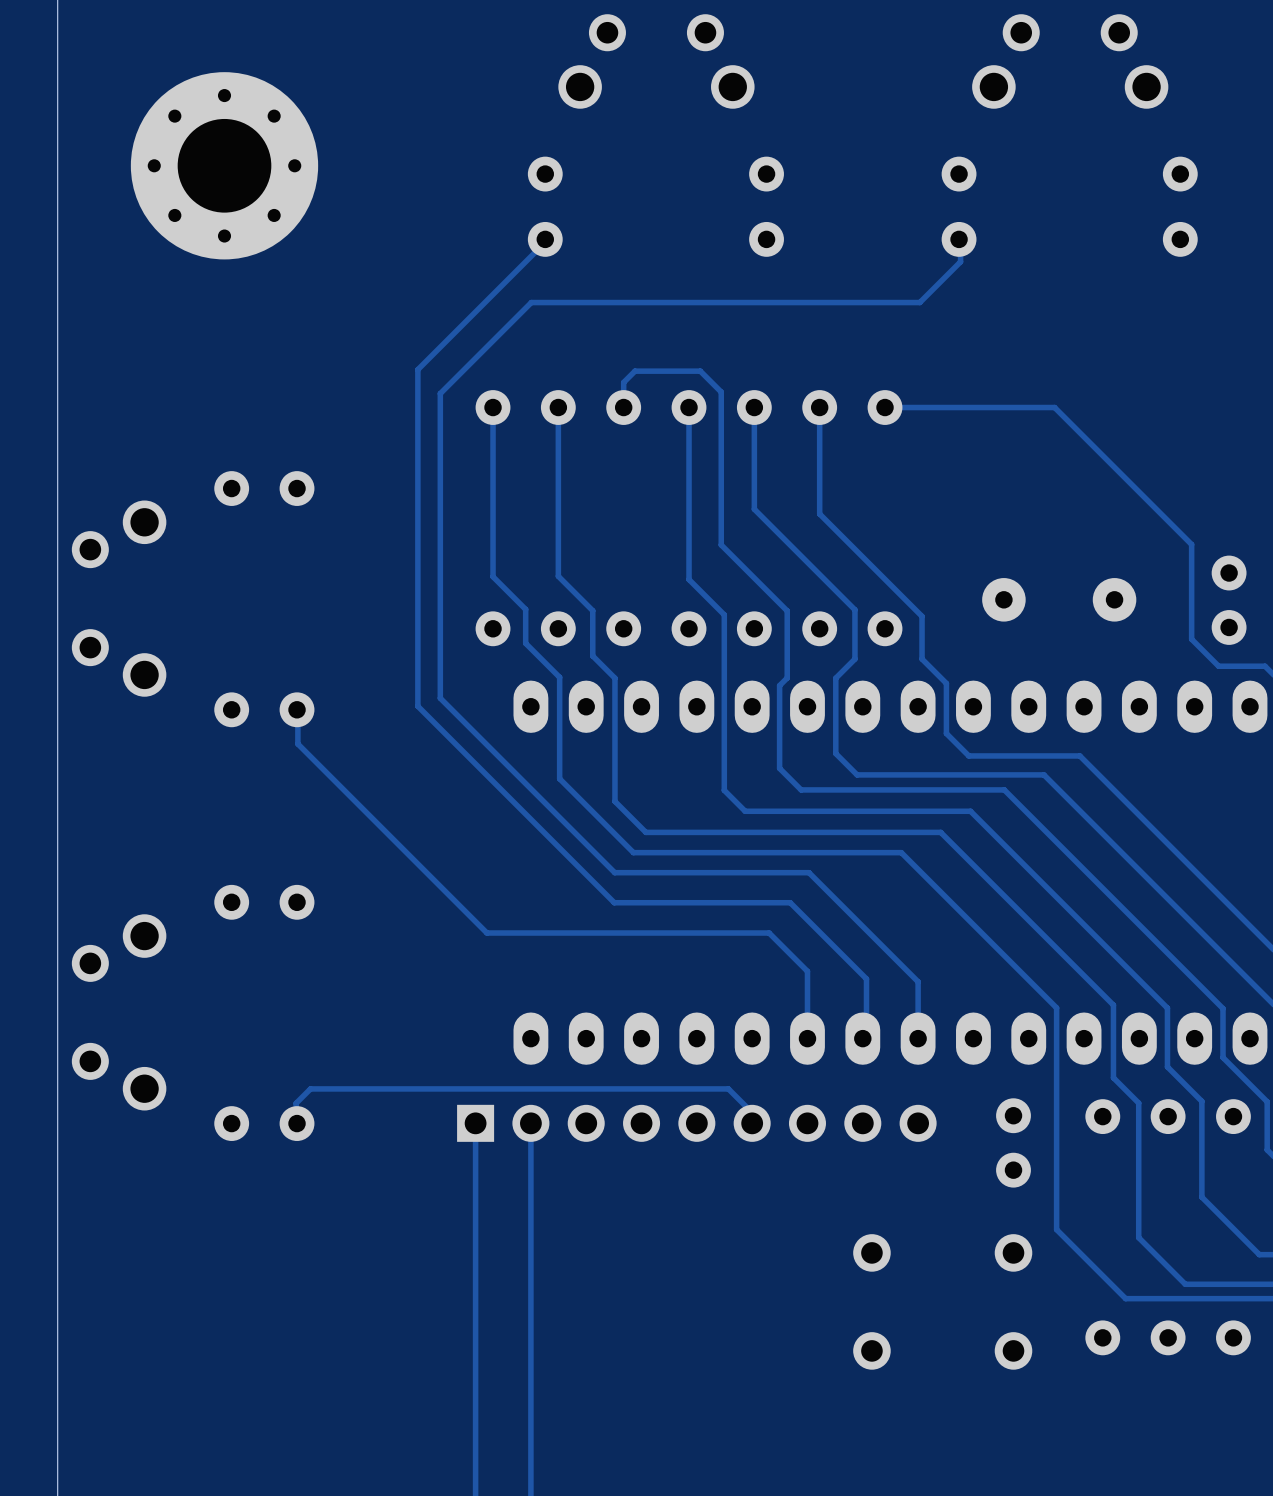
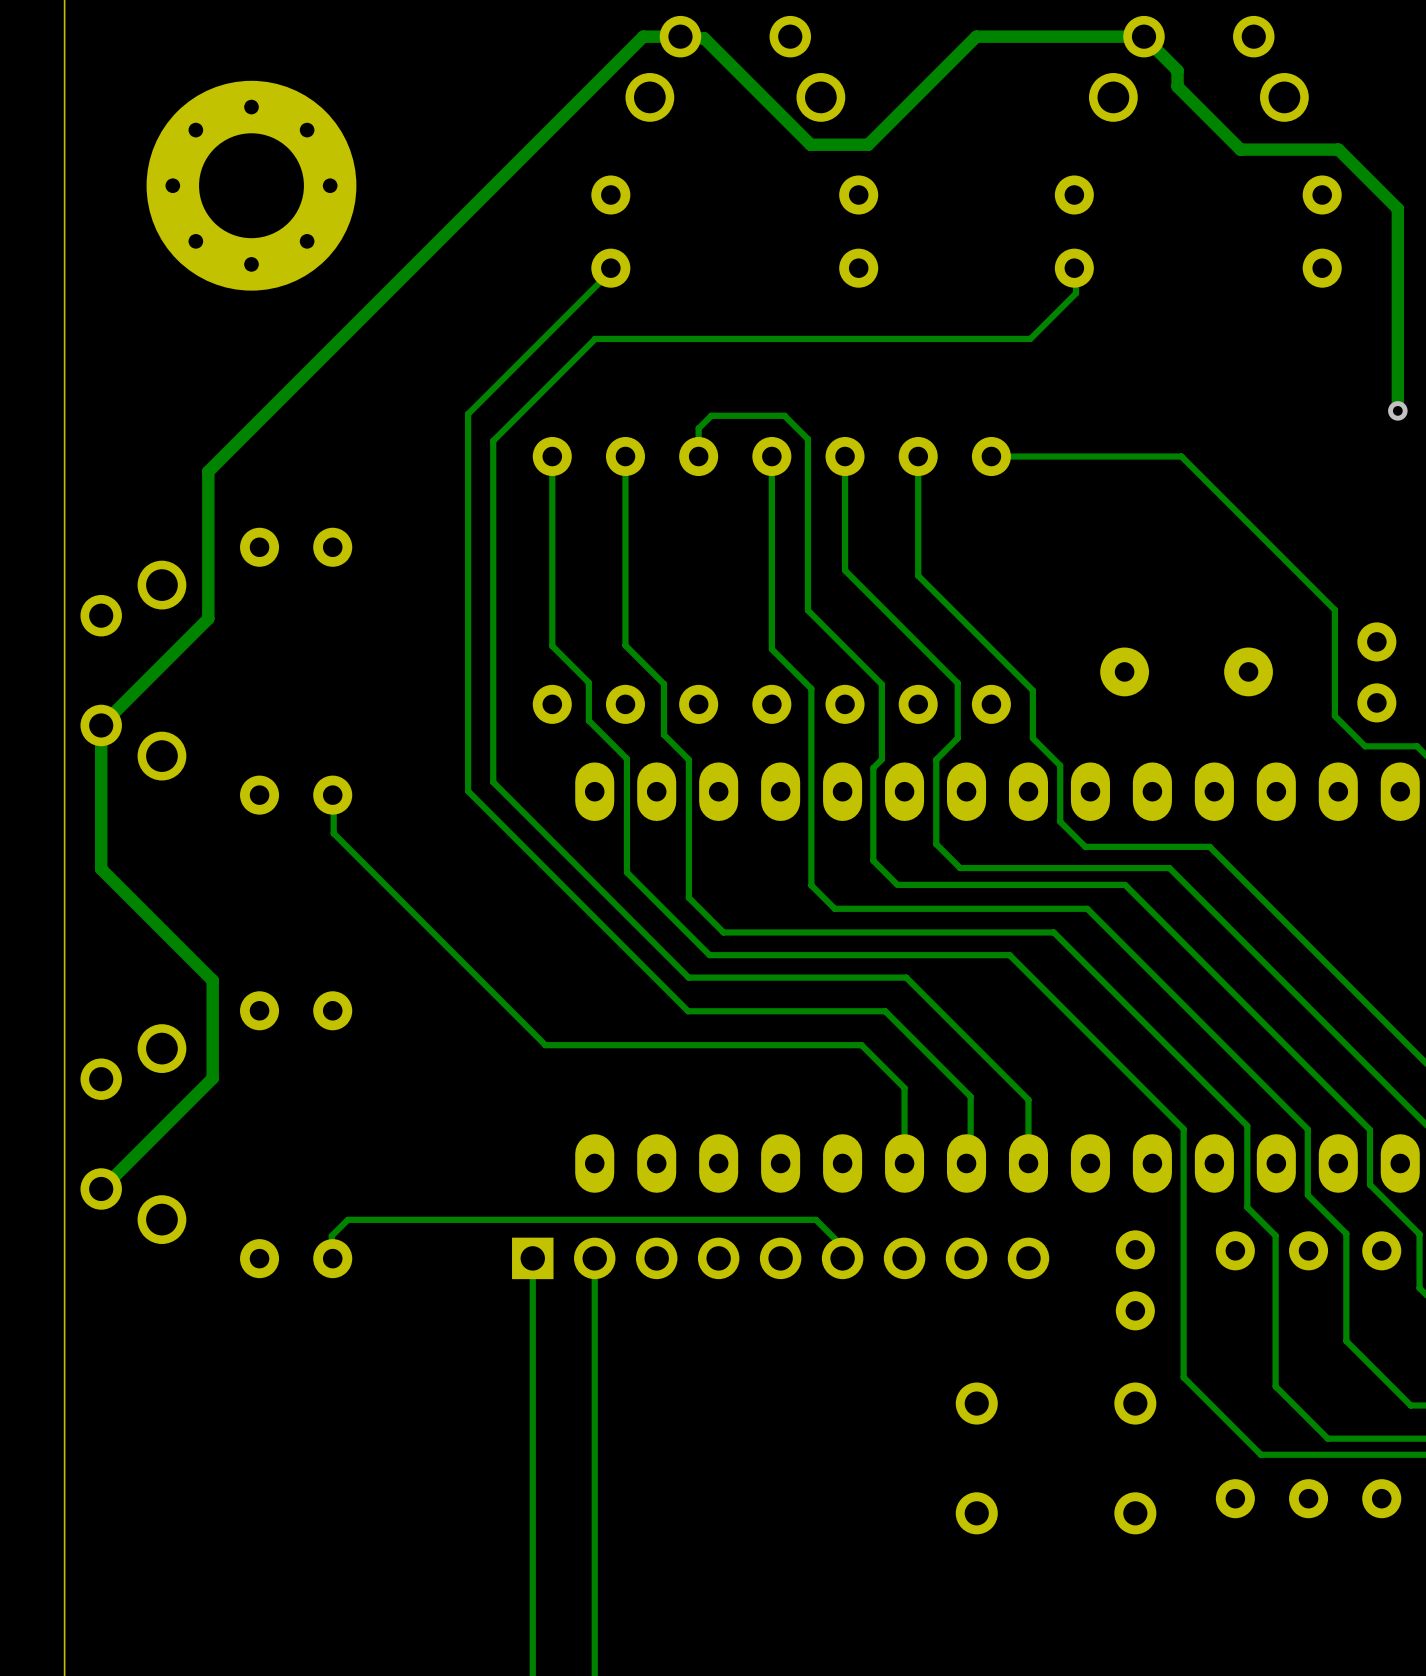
track: none -> (680, 36) (643, 36) (208, 471) (208, 618) (101, 725)
track: none -> (1144, 36) (976, 36) (868, 144) (810, 144) (704, 38) (684, 38)
track: none -> (1146, 39) (1177, 70) (1177, 86) (1240, 149) (1338, 149) (1397, 208) (1397, 410)
via: none -> (1397, 410)
track: none -> (101, 725) (101, 869) (212, 980) (212, 1078) (101, 1189)

